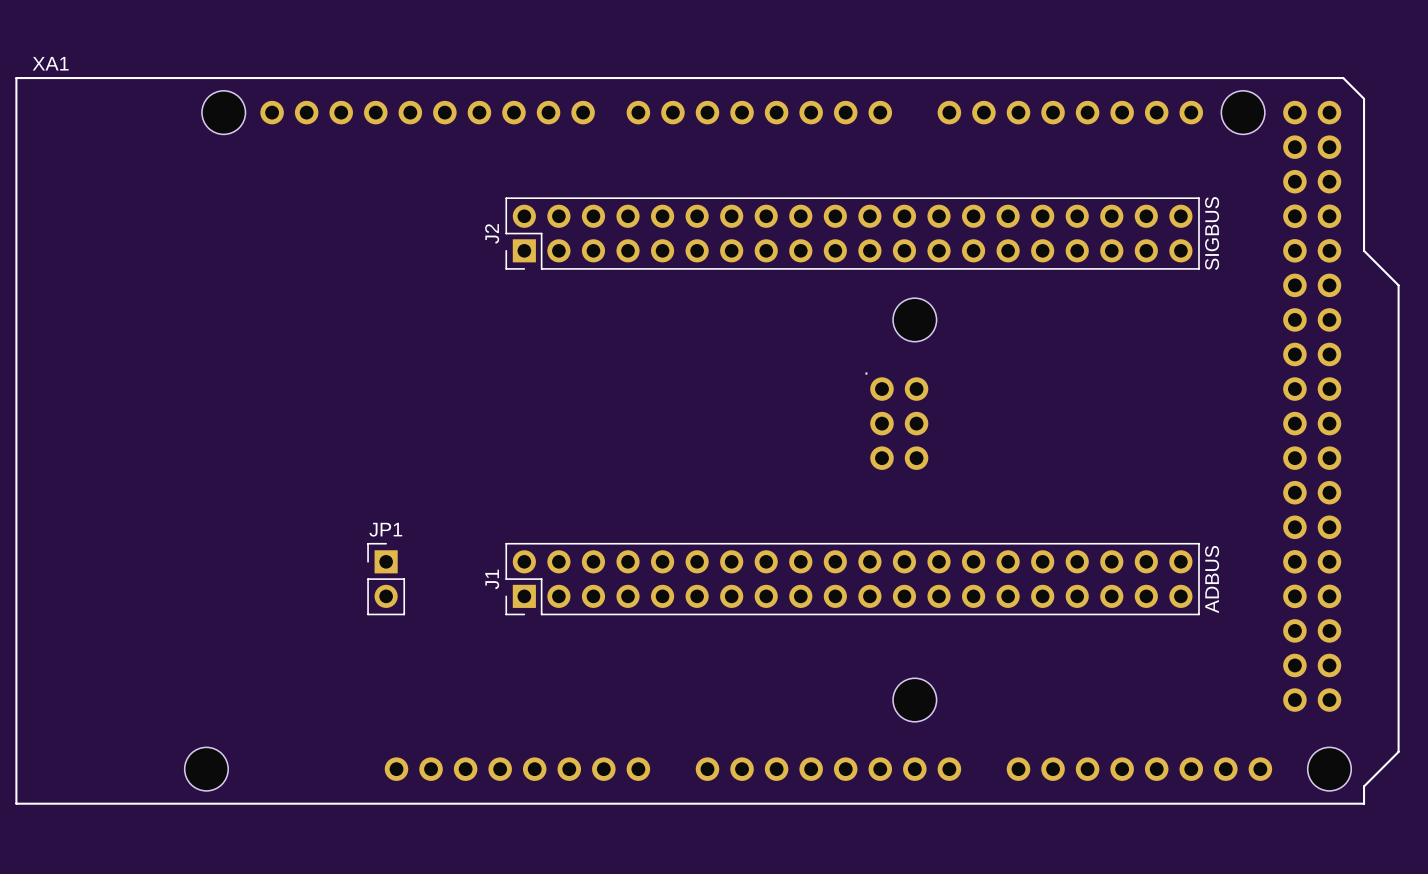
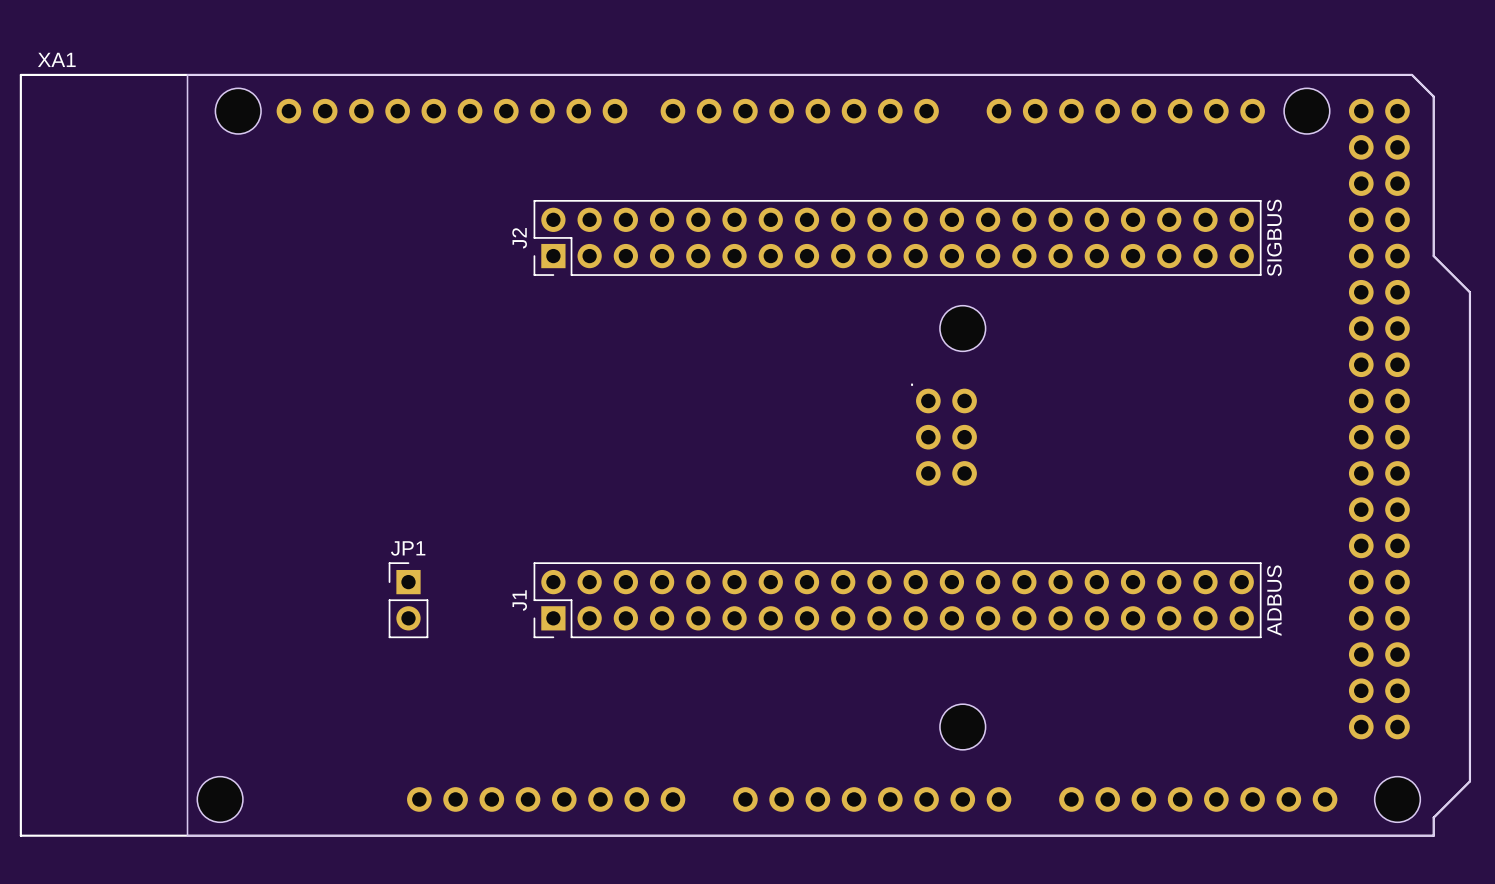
board edge: none -> (187, 74) (1411, 74) (1433, 96) (1433, 256) (1469, 292) (1469, 781) (1433, 817) (1433, 835) (187, 835) (187, 74)

